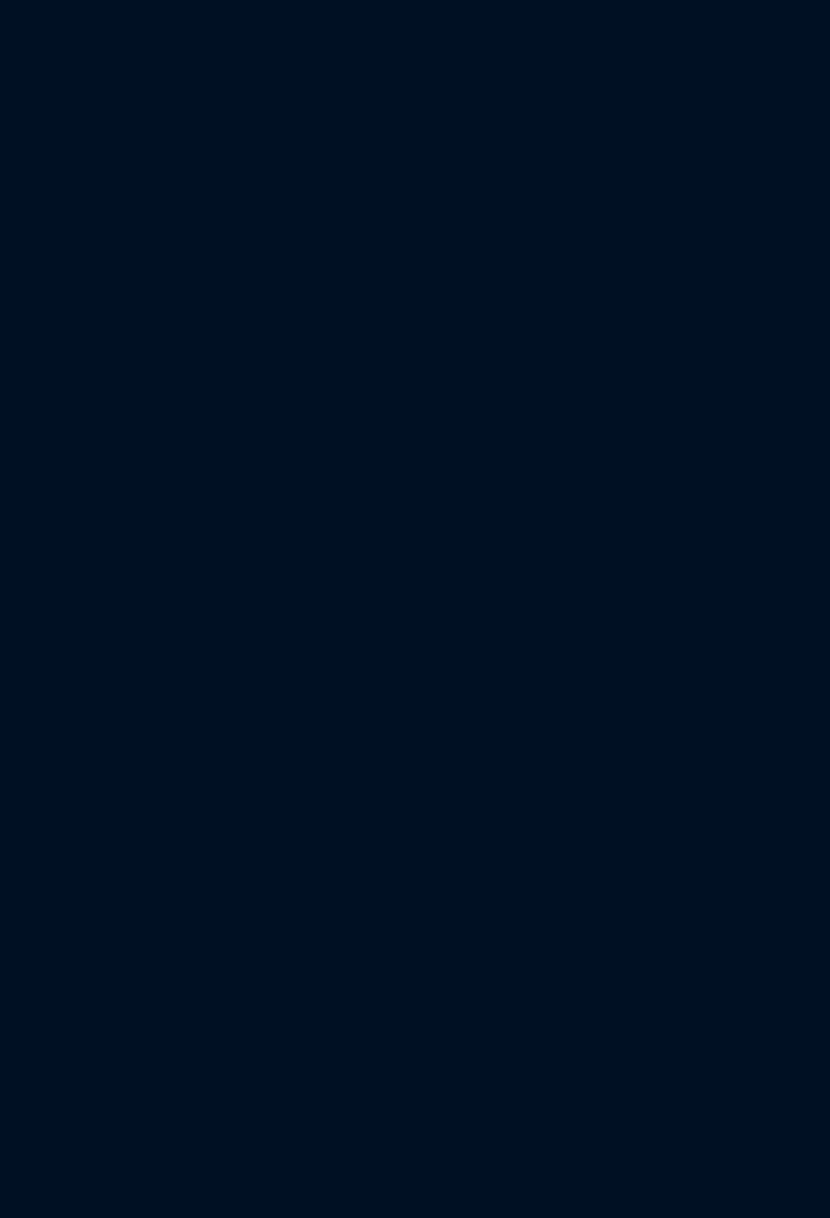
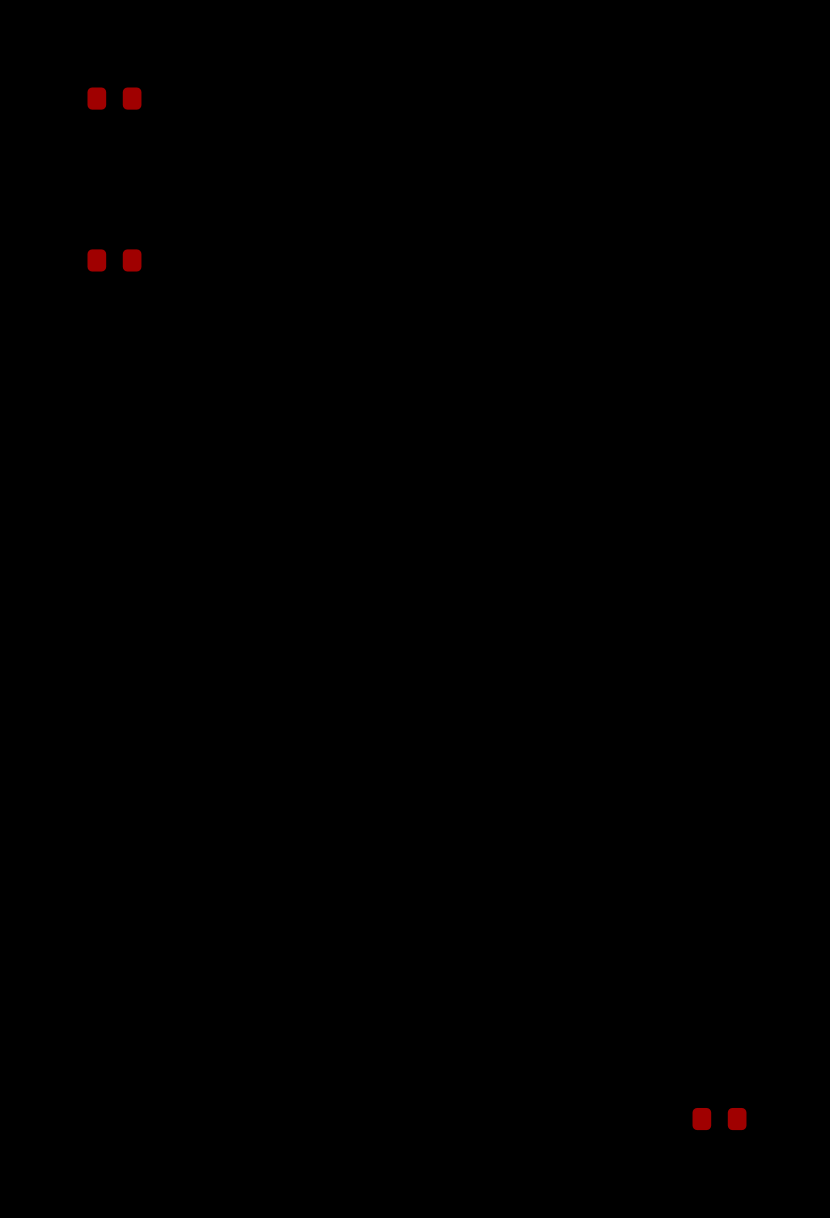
part: none -> (114, 98)
part: none -> (114, 260)
part: none -> (719, 1119)

